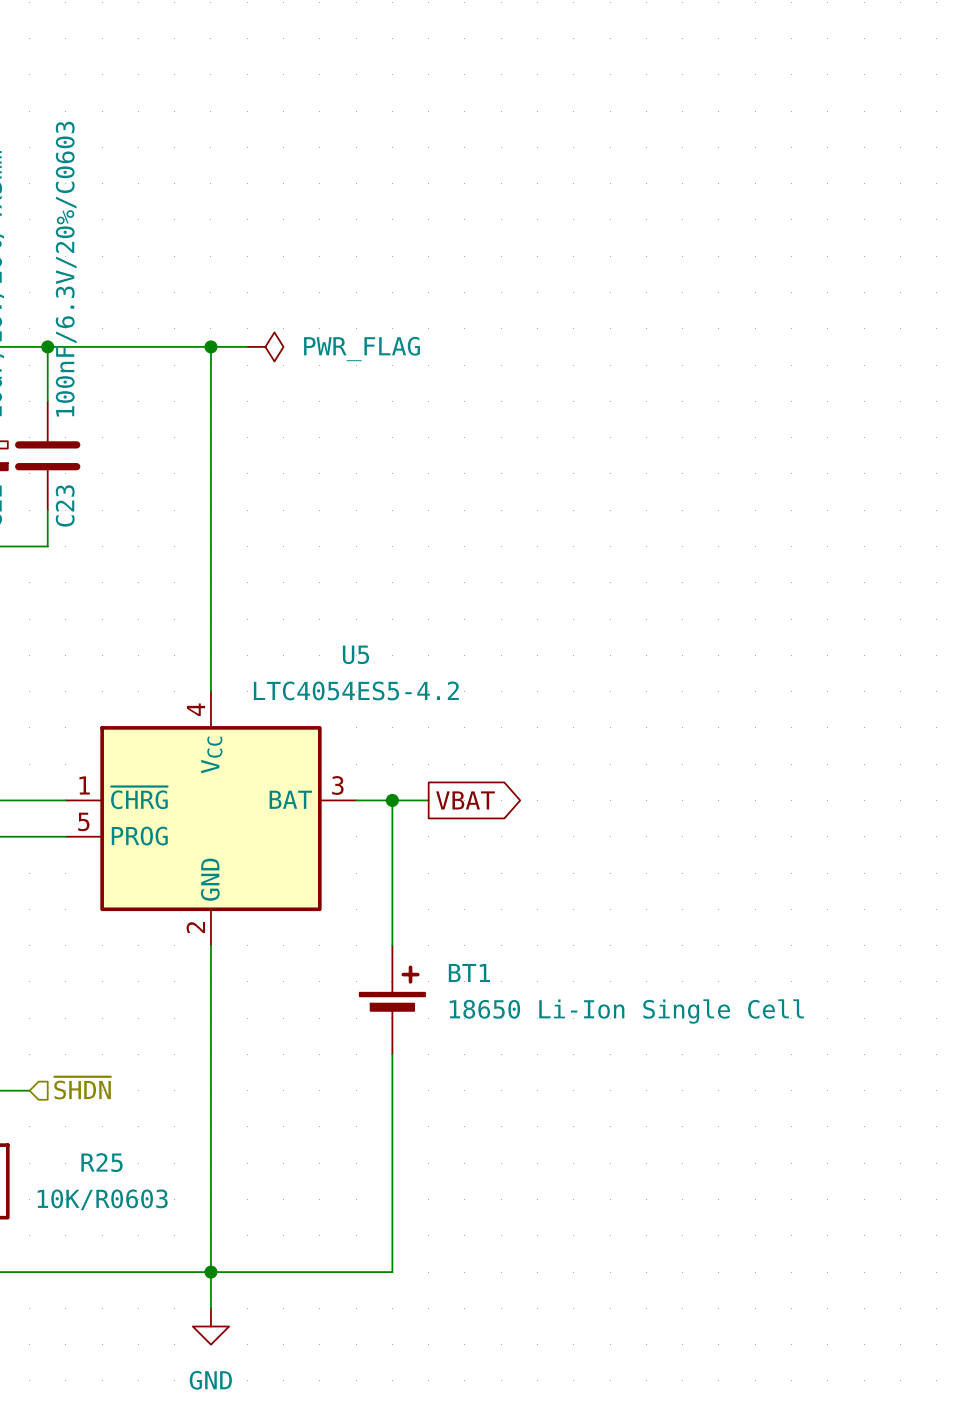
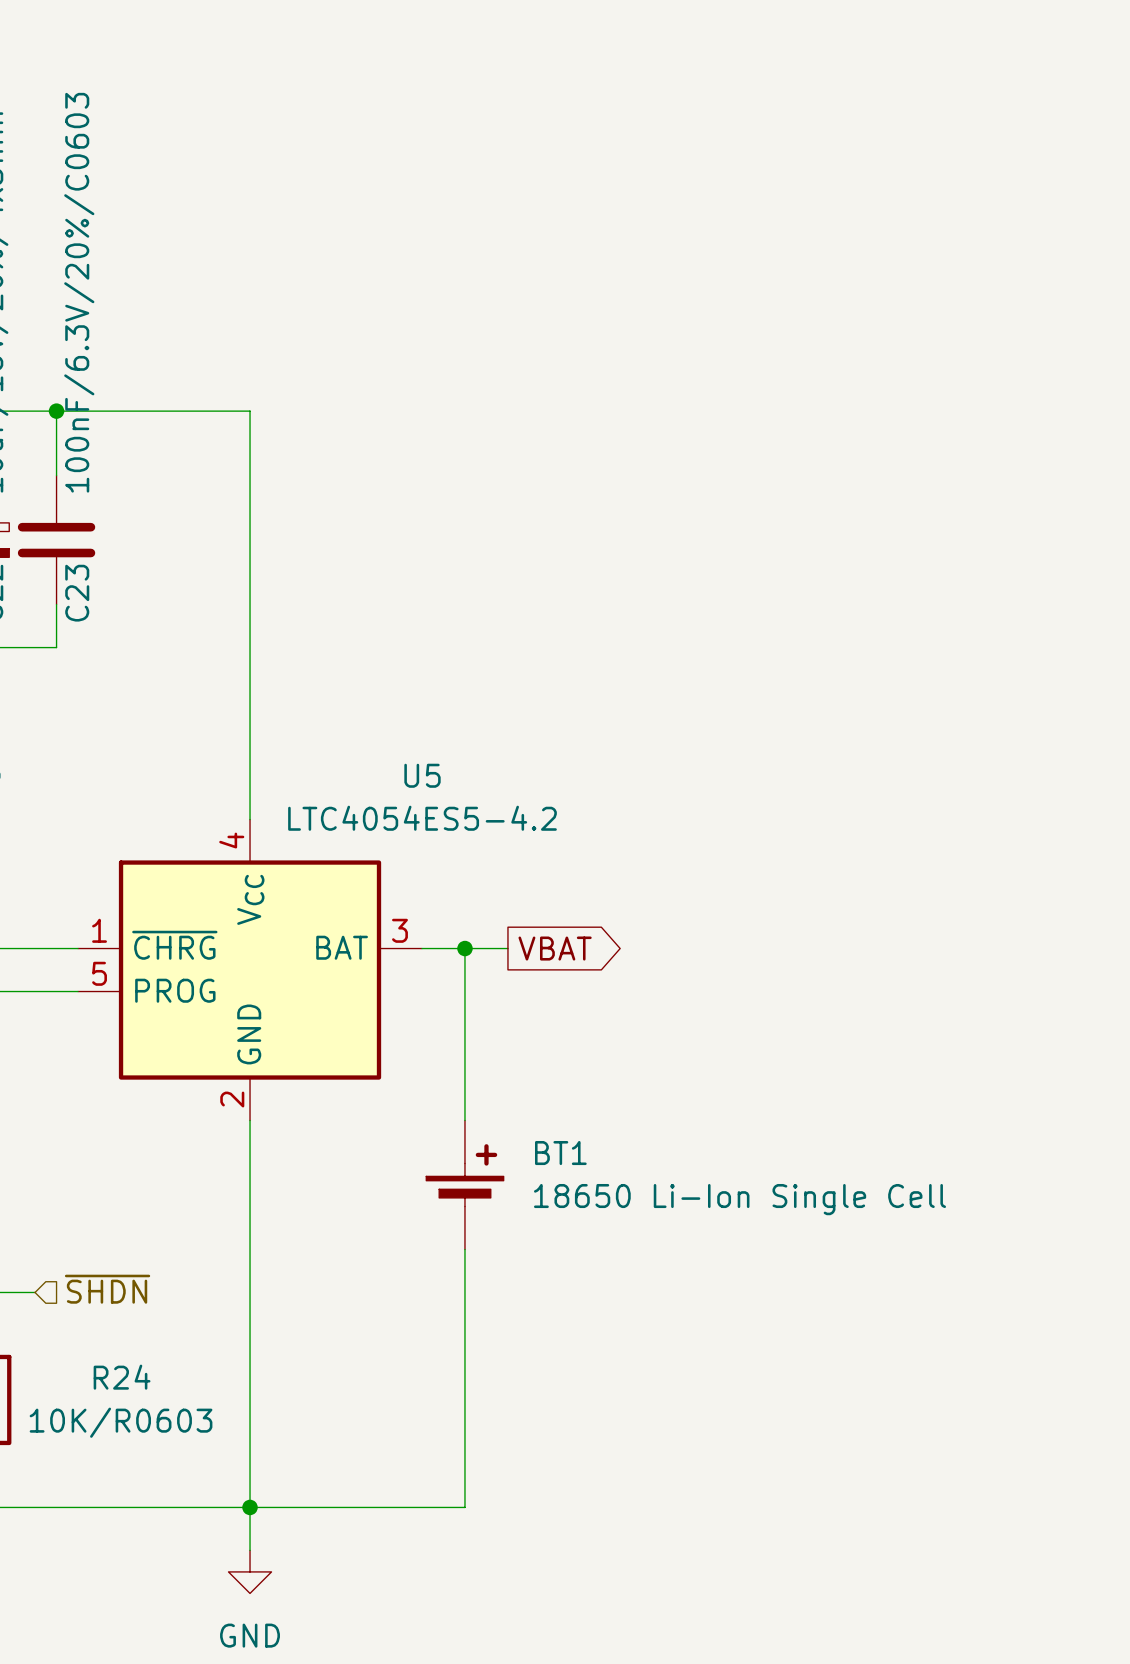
wire: (210, 346) (247, 346) -> none
junction: (210, 346) -> none
power symbol: PWR_FLAG (265, 346) -> none
R25 name: R25 (102, 1162) -> R24 (122, 1377)

